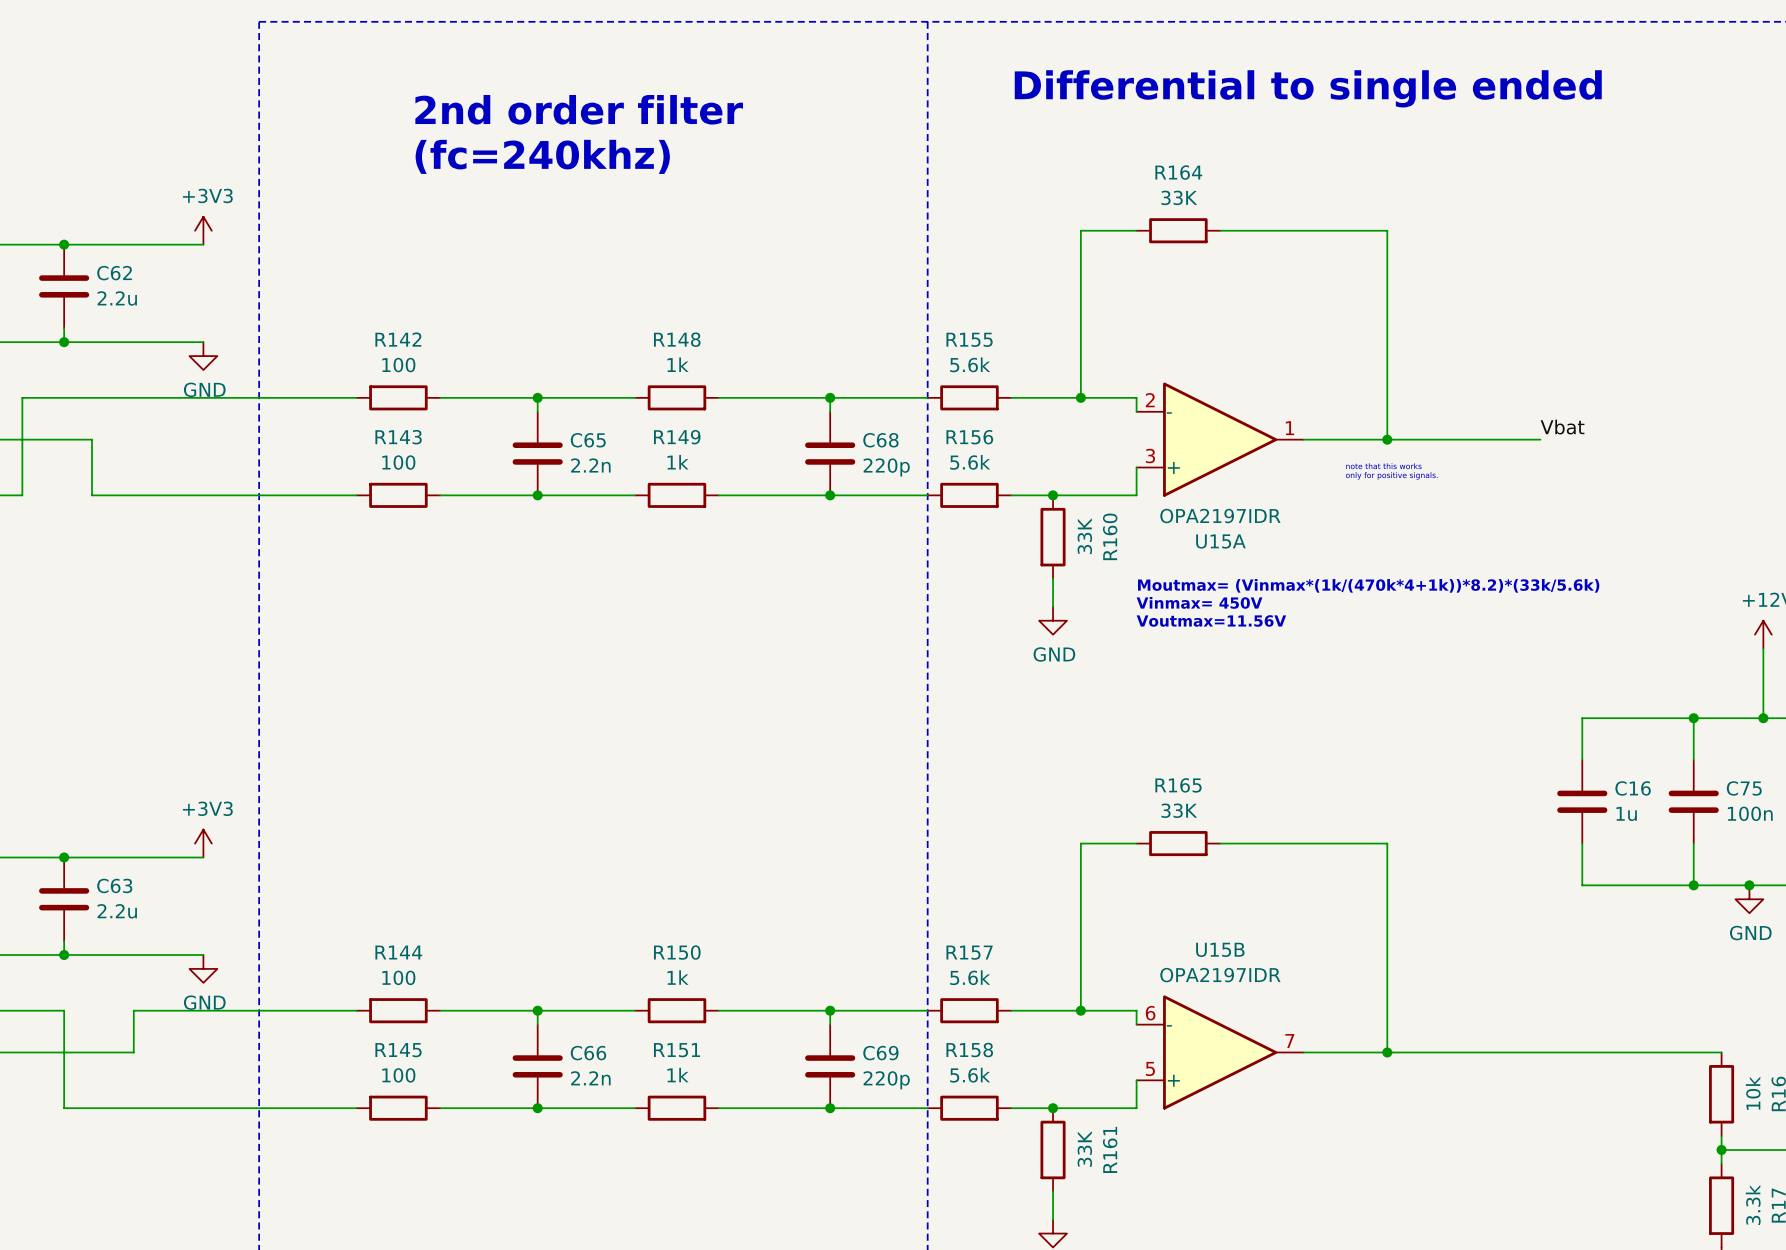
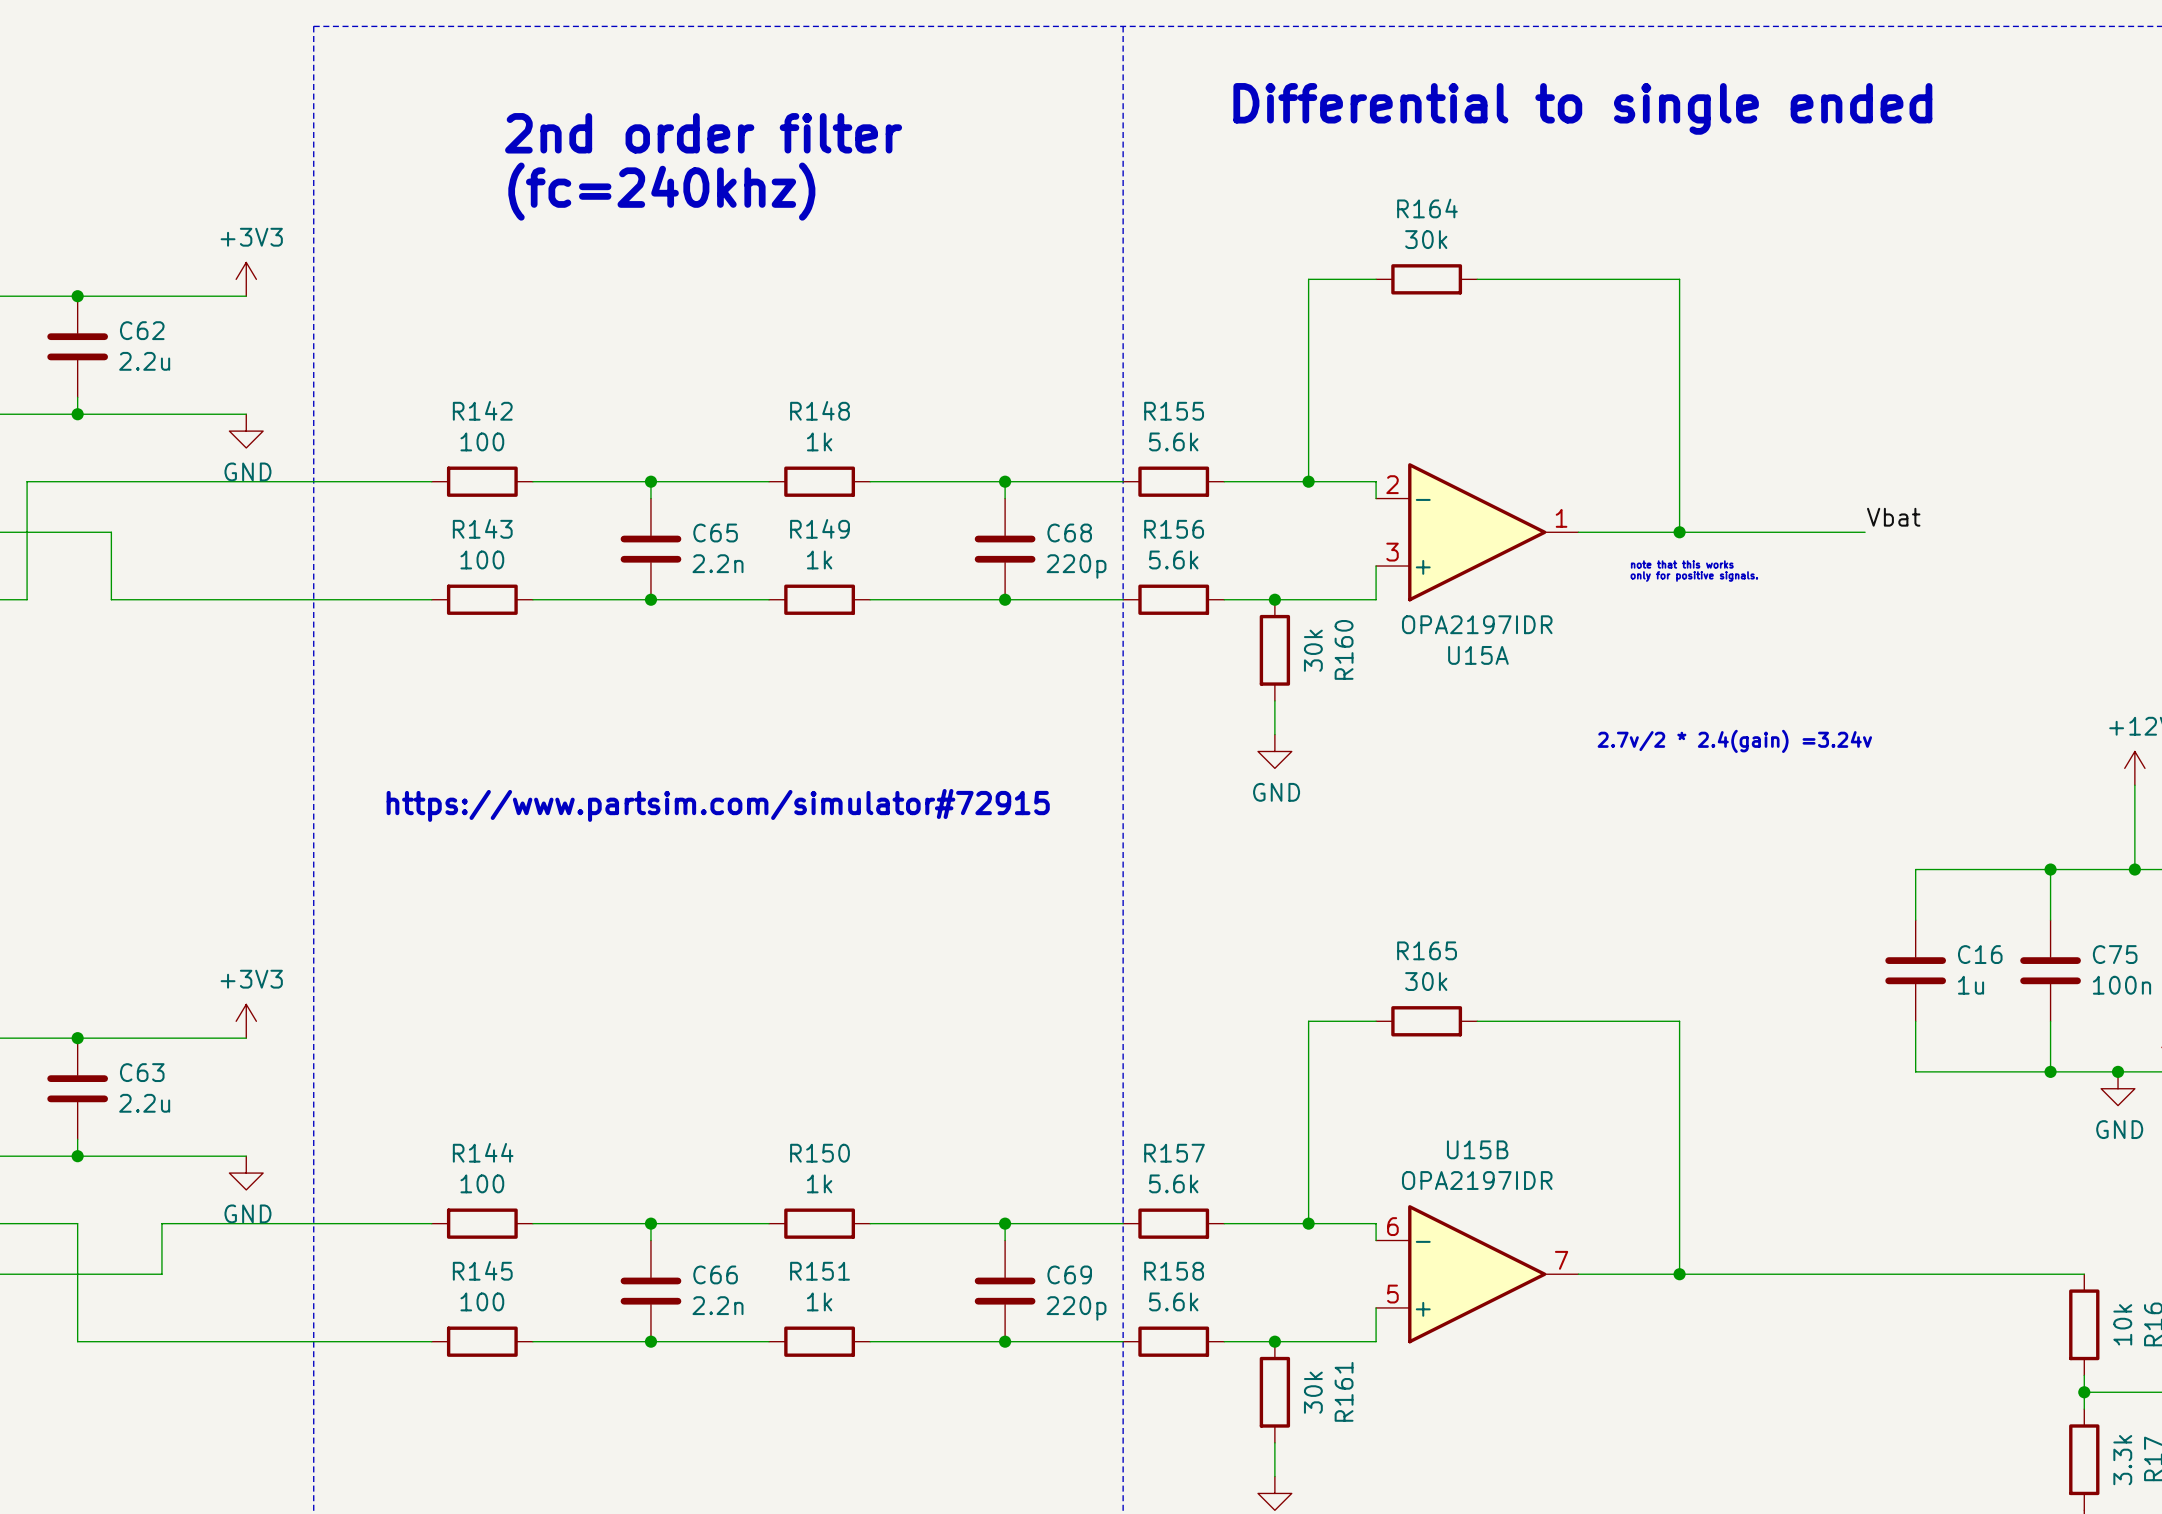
R164 value: 33K (1179, 197) -> 30k (1426, 239)
R160 value: 33K (1084, 536) -> 30k (1313, 650)
text: Moutmax= (Vinmax*(1k/(470k*4+1k))*8.2)*(33k/5.6k) (1368, 585) -> none
text: Vinmax= 450V (1199, 602) -> none
text: none -> 2.7v/2 * 2.4(gain) =3.24v (1734, 741)
text: Voutmax=11.56V (1211, 620) -> none
text: none -> https://www.partsim.com/simulator#72915 (718, 805)
R165 value: 33K (1179, 810) -> 30k (1426, 981)
R161 value: 33K (1084, 1149) -> 30k (1313, 1392)

